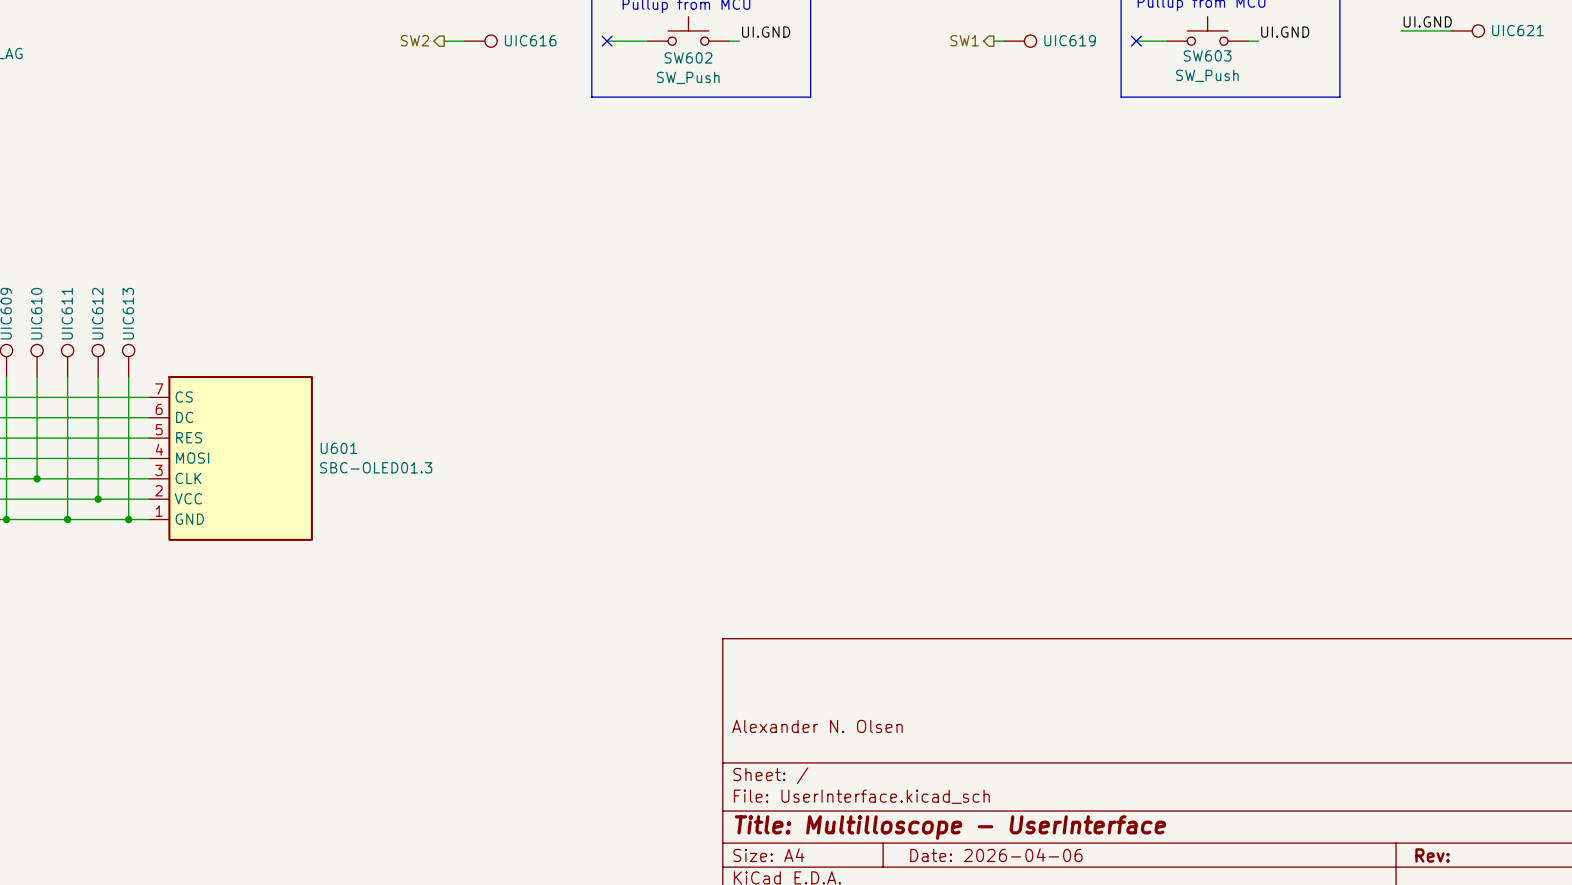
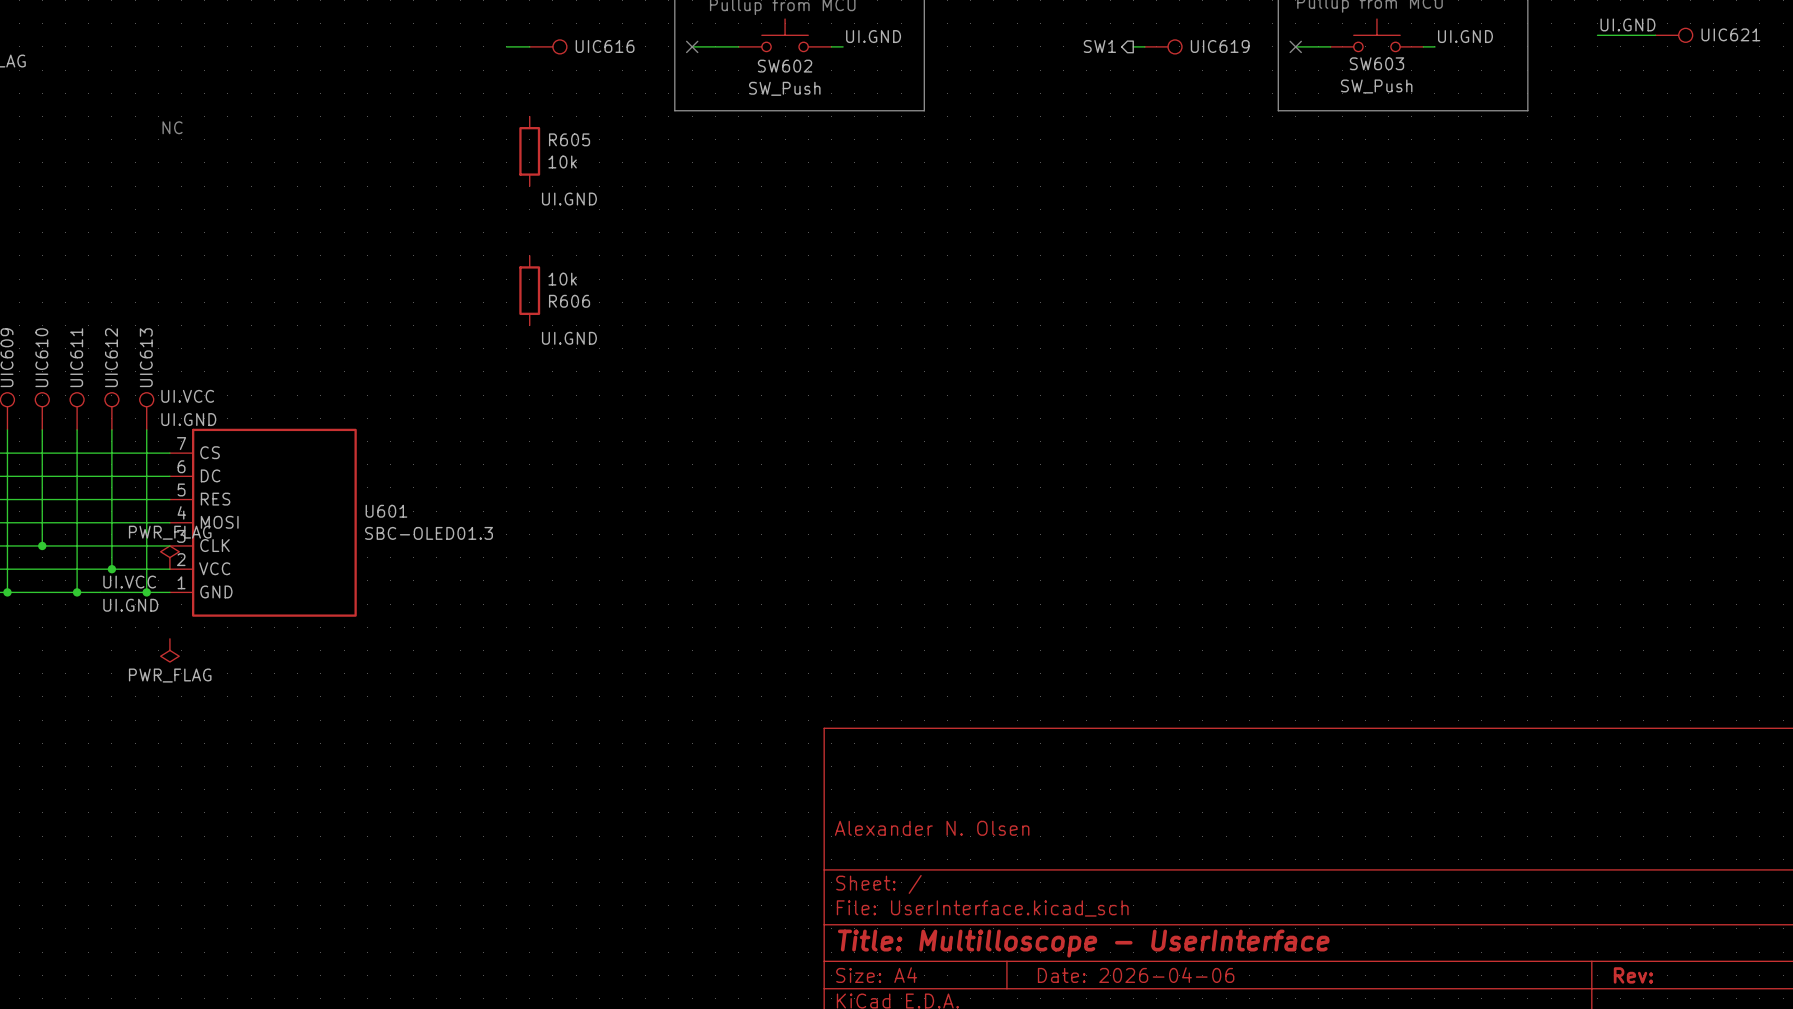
hierarchical label: SW2 (414, 40) -> none
text: none -> NC (172, 127)
R605: none -> 10k (529, 151)
label: none -> UI.GND (569, 199)
R606: none -> 10k (529, 290)
label: none -> UI.GND (569, 338)
label: none -> UI.VCC (187, 396)
label: none -> UI.GND (188, 419)
power symbol: none -> PWR_FLAG (169, 557)
label: none -> UI.VCC (129, 582)
label: none -> UI.GND (130, 605)
power symbol: none -> PWR_FLAG (169, 650)

